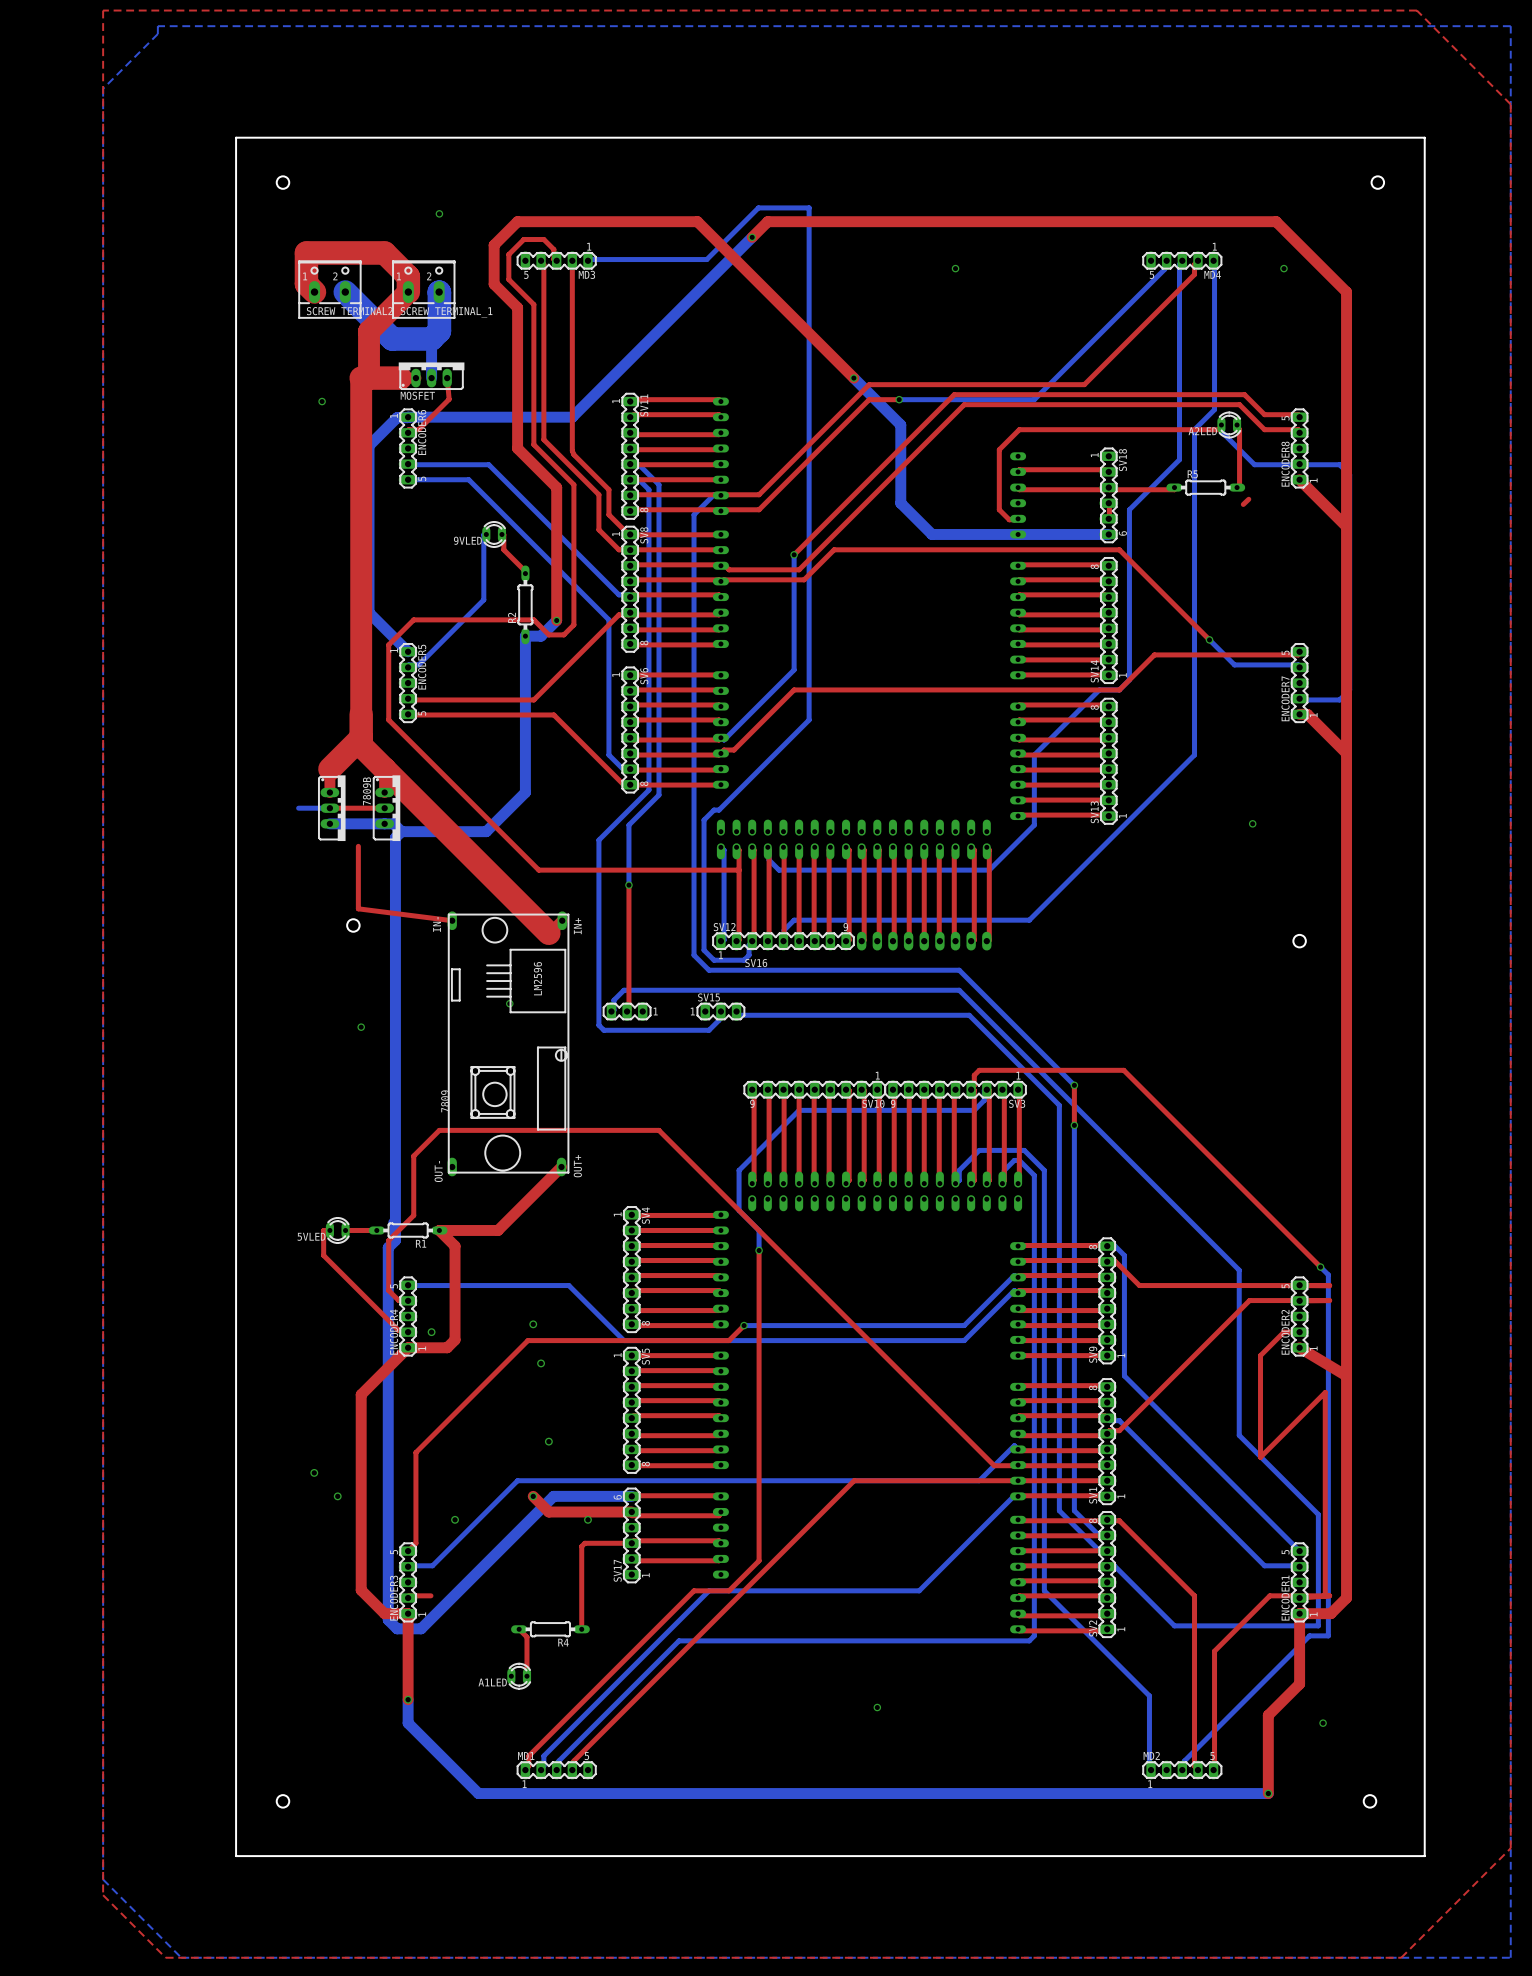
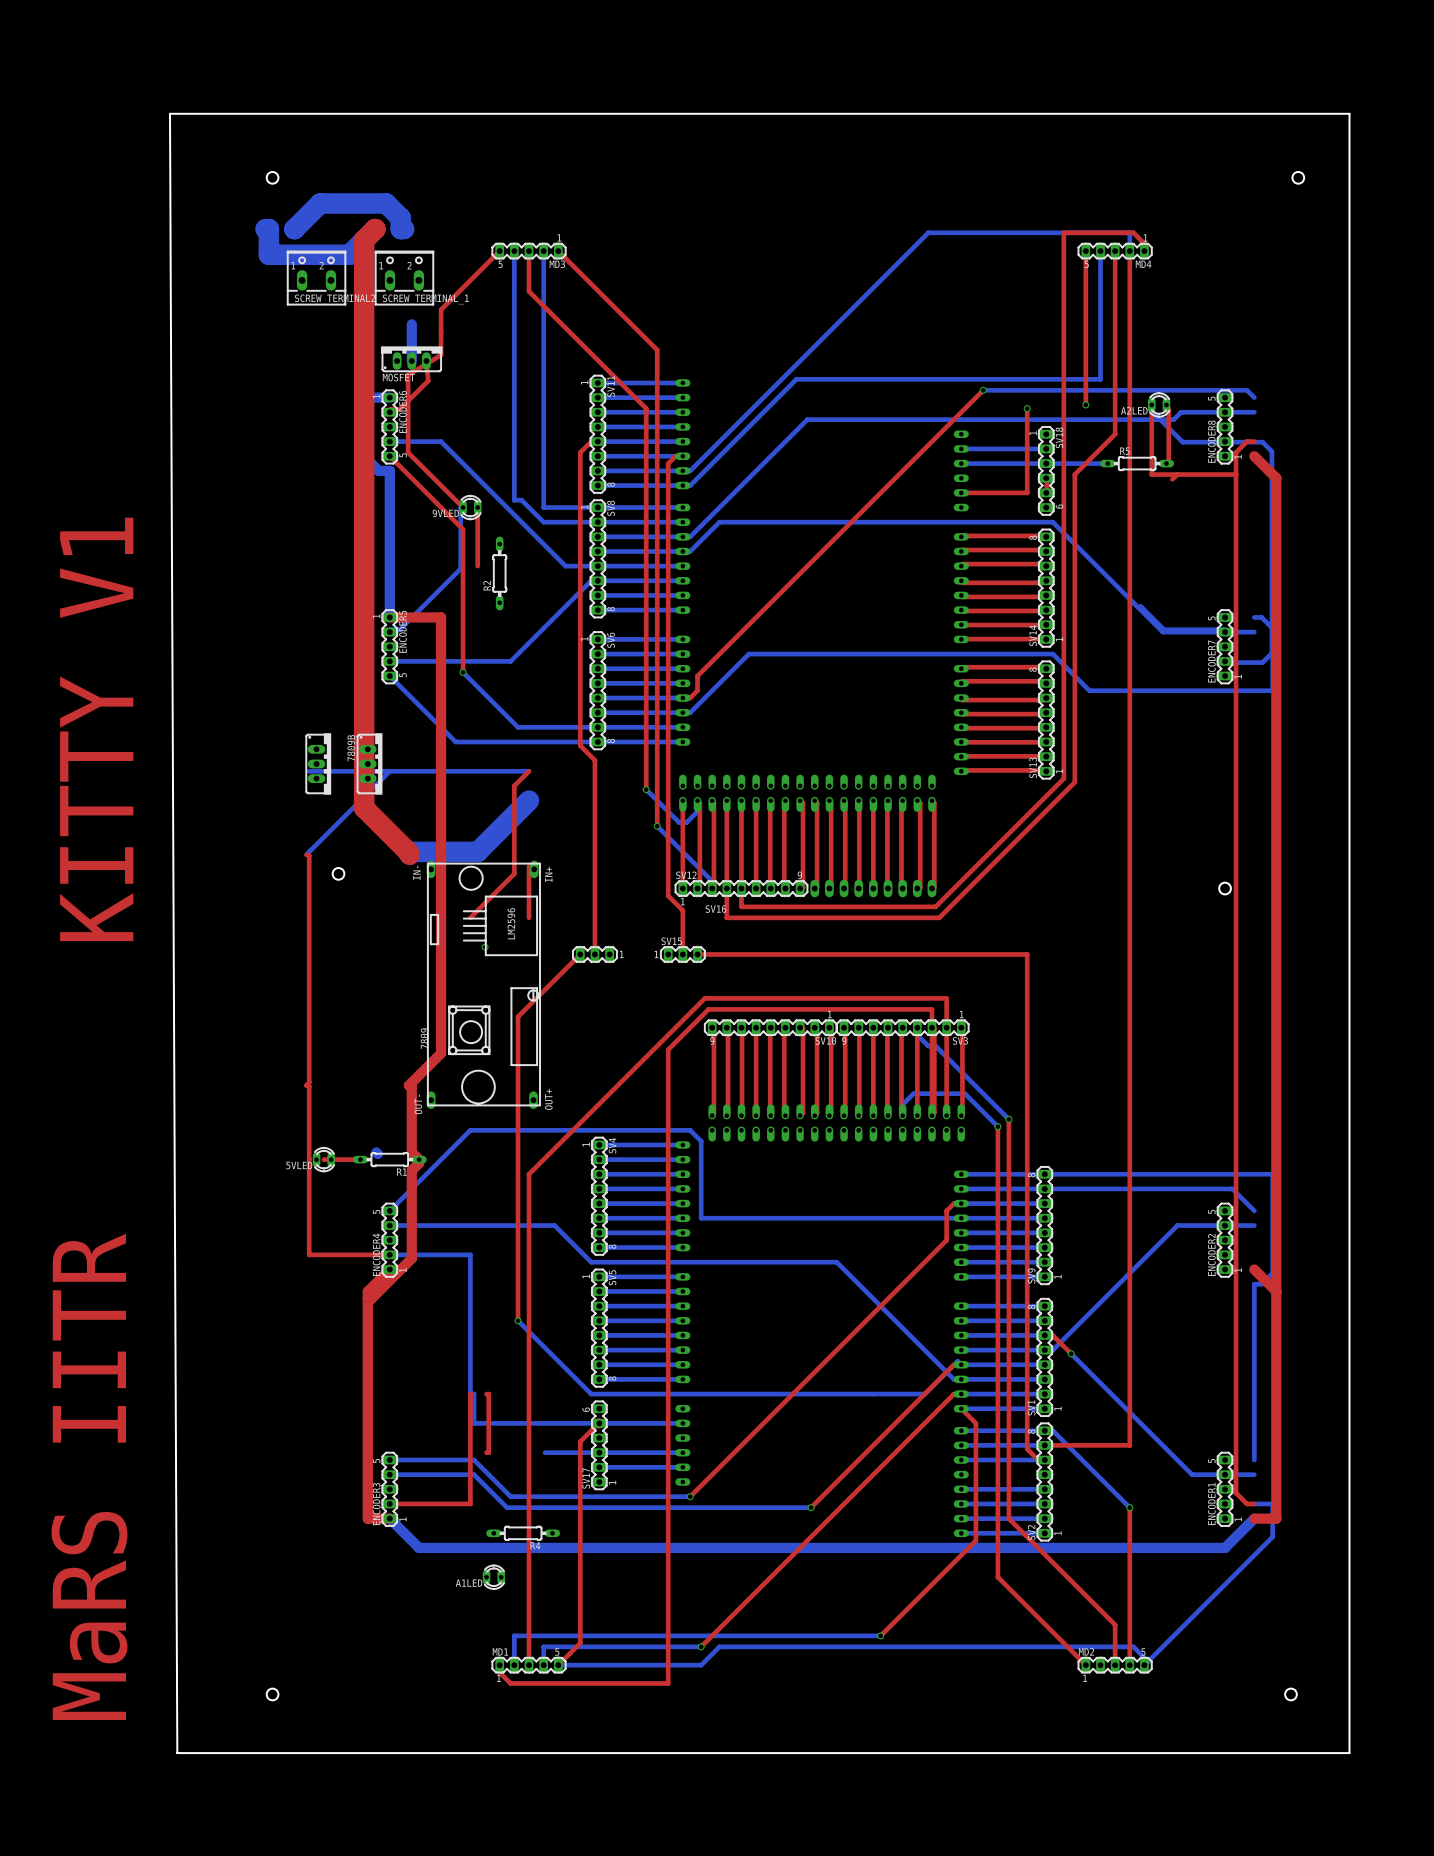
top zone outline: (103, 10) (103, 1895) (165, 1957) (1401, 1957) (1510, 1848) (1510, 104) (1416, 10) (103, 10) -> none
bottom zone outline: (157, 26) (1510, 26) (1510, 1957) (181, 1957) (103, 1879) (103, 88) (157, 34) (157, 26) -> none
board edge: (236, 137) (1424, 137) (1424, 1856) (236, 1856) (236, 137) -> (169, 113) (177, 1753) (1349, 1753) (1349, 113) (169, 113)
via: (439, 213) -> none
bottom track: none -> (265, 229) (268, 229) (268, 254) (349, 254) (375, 229)
bottom track: none -> (294, 229) (320, 203) (386, 203) (400, 218) (400, 229) (404, 229)
top track: none -> (375, 229) (364, 240) (364, 807) (409, 854)
bottom track: (752, 237) (572, 417) (397, 417) (369, 445) (369, 612) (408, 651) -> (389, 397) (367, 397) (367, 459) (378, 470) (389, 470) (389, 617)
top track: (752, 237) (767, 221) (1276, 221) (1346, 292) (1346, 1598) (1330, 1613) (1299, 1613) (1299, 1684) (1268, 1715) (1268, 1793) -> none
via: (752, 237) -> none
top track: none -> (499, 251) (441, 309) (441, 355) (408, 374) (408, 452) (463, 507)
bottom track: none -> (514, 251) (514, 500) (521, 500) (543, 522) (682, 522)
top track: (541, 260) (543, 264) (543, 439) (598, 494) (598, 529) (618, 549) (720, 550) -> none
top track: (556, 260) (553, 259) (553, 249) (543, 239) (523, 239) (508, 254) (508, 279) (533, 304) (533, 444) (573, 484) (573, 624) (563, 634) (548, 634) (533, 619) (413, 619) (388, 644) (388, 719) (538, 870) (739, 870) -> (529, 251) (529, 291) (646, 408) (646, 789)
bottom track: none -> (543, 251) (543, 507) (682, 507)
top track: (572, 260) (572, 450) (573, 454) (608, 489) (608, 514) (628, 534) (720, 534) -> none
bottom track: (587, 260) (706, 259) (758, 207) (809, 207) (809, 719) (719, 810) (714, 810) (704, 820) (704, 950) (714, 960) (744, 960) (749, 955) (749, 945) (752, 941) -> (657, 826) (712, 881) (712, 888)
top track: none -> (558, 251) (657, 350) (657, 826)
top track: none -> (1085, 251) (1085, 404)
bottom track: (1166, 260) (1164, 269) (1034, 399) (899, 399) -> (1100, 251) (1100, 379) (796, 379) (690, 485) (597, 485)
bottom track: (1182, 260) (1179, 264) (1179, 459) (1129, 509) (1129, 679) (1119, 689) (1099, 689) (1034, 755) (1034, 825) (989, 870) (779, 870) (769, 860) (767, 847) -> none
bottom track: none -> (1129, 251) (1129, 232) (928, 232) (690, 470) (597, 470)
top track: (1197, 260) (1194, 264) (1194, 274) (1084, 384) (869, 384) (759, 494) (630, 495) -> (1129, 251) (1129, 1445) (1044, 1445)
bottom track: (1213, 260) (1214, 409) (1194, 429) (1194, 755) (1029, 920) (794, 920) (784, 930) (783, 941) -> none
via: (955, 268) -> none
via: (1283, 268) -> none
top track: (314, 292) (306, 284) (306, 252) (384, 252) (408, 276) (408, 292) (369, 331) (369, 378) -> none
bottom track: (345, 292) (392, 338) (431, 338) (439, 331) (439, 292) -> none
top track: (415, 378) (361, 378) (361, 745) (548, 933) (562, 920) (559, 920) -> none
bottom track: (853, 378) (900, 425) (900, 503) (932, 534) (1108, 534) -> none
top track: (853, 378) (697, 221) (517, 221) (494, 245) (494, 284) (517, 307) (517, 448) (556, 487) (556, 620) -> none
via: (853, 378) -> none
top track: (899, 399) (869, 399) (759, 509) (630, 511) -> none
via: (899, 399) -> none
via: (322, 401) -> none
bottom track: none -> (597, 382) (682, 382)
top track: (630, 401) (633, 399) (719, 399) (720, 401) -> none
bottom track: none -> (983, 390) (1247, 390) (1254, 397)
via: none -> (983, 390)
bottom track: none -> (597, 397) (682, 397)
top track: (630, 417) (633, 414) (719, 414) (720, 417) -> none
top track: (1299, 417) (1298, 414) (1264, 414) (1244, 394) (954, 394) (794, 554) -> none
via: none -> (1085, 404)
top track: (1221, 425) (1219, 429) (1019, 429) (999, 449) (999, 509) (1009, 519) (1018, 518) -> (1027, 408) (1027, 492) (961, 492)
top track: none -> (1151, 404) (1151, 474) (1236, 474)
via: none -> (1027, 408)
bottom track: none -> (597, 412) (682, 412)
top track: (630, 432) (633, 434) (719, 434) (720, 432) -> none
top track: (1299, 432) (1298, 429) (1264, 429) (1239, 404) (964, 404) (799, 569) (729, 569) (724, 564) (630, 565) -> none
bottom track: none -> (1254, 412) (1181, 412) (1173, 419) (807, 419) (690, 536) (597, 536)
bottom track: none -> (597, 426) (682, 426)
top track: (630, 448) (720, 448) -> none
bottom track: (408, 464) (488, 464) (618, 594) (628, 594) (630, 597) -> (389, 441) (441, 441) (565, 566) (682, 566)
bottom track: (630, 464) (638, 464) (658, 484) (658, 795) (628, 825) (628, 885) -> (597, 441) (682, 441)
top track: (630, 464) (720, 464) -> none
top track: none -> (1254, 441) (1247, 441) (1236, 452) (1236, 1492) (1247, 1503) (1254, 1503)
bottom track: none -> (961, 448) (1046, 448)
top track: (1018, 471) (1019, 469) (1104, 469) (1108, 471) -> none
bottom track: (408, 479) (468, 479) (608, 619) (608, 755) (623, 770) (630, 769) -> none
top track: none -> (389, 456) (463, 529) (463, 672)
top track: (630, 479) (713, 479) -> (682, 954) (682, 910) (668, 895) (668, 463) (675, 456)
bottom track: (638, 479) (648, 489) (648, 790) (598, 840) (598, 1025) (603, 1030) (709, 1030) (719, 1020) (720, 1011) -> (606, 456) (682, 456)
top track: (1299, 479) (1346, 526) -> none
top track: none -> (1254, 456) (1276, 478) (1276, 1518) (1254, 1518)
bottom track: none -> (961, 463) (1107, 463)
top track: (1018, 487) (1019, 489) (1104, 489) (1108, 487) (1109, 489) (1174, 489) (1174, 487) -> none
bottom track: (720, 495) (714, 494) (694, 514) (694, 955) (709, 970) (959, 970) (1074, 1085) -> none
top track: (501, 534) (503, 534) (503, 549) (525, 573) -> (477, 507) (477, 566)
bottom track: (794, 554) (794, 669) (724, 740) (720, 737) -> (597, 698) (682, 698)
via: (794, 554) -> none
bottom track: none -> (597, 551) (690, 551) (719, 522) (1052, 522) (1162, 632) (1254, 632)
top track: (630, 581) (633, 579) (719, 579) (720, 581) (724, 579) (804, 579) (834, 549) (1119, 549) (1209, 639) -> none
top track: (630, 597) (633, 594) (719, 594) (720, 597) -> none
bottom track: none -> (682, 580) (591, 580) (510, 661) (389, 661)
top track: (720, 612) (719, 614) (633, 614) (630, 612) (628, 614) (618, 614) (533, 699) (408, 698) -> none
bottom track: (556, 620) (541, 636) (525, 636) (525, 792) (486, 831) (401, 831) -> none
via: (556, 620) -> none
bottom track: none -> (597, 595) (682, 595)
top track: (630, 628) (633, 629) (719, 629) (720, 628) -> none
via: (1209, 639) -> none
bottom track: none -> (597, 610) (682, 610)
top track: (630, 643) (720, 643) -> none
top track: none -> (389, 617) (441, 617) (441, 1053) (408, 1085) (411, 1086) (411, 1152) (419, 1159) (419, 1163) (411, 1170) (411, 1258) (371, 1298) (367, 1298)
top track: (1299, 651) (1298, 654) (1154, 654) (1119, 689) (794, 689) (734, 750) (724, 750) (719, 755) (630, 753) -> none
bottom track: none -> (1254, 617) (1261, 617) (1272, 628) (1272, 690) (1089, 690) (1052, 654) (748, 654) (690, 712) (597, 712)
bottom track: none -> (597, 639) (682, 639)
top track: (630, 675) (720, 675) -> none
bottom track: none -> (597, 654) (682, 654)
top track: (630, 690) (720, 690) -> none
bottom track: none -> (597, 668) (682, 668)
top track: (630, 706) (633, 704) (719, 704) (720, 706) -> none
bottom track: none -> (463, 672) (518, 727) (682, 727)
via: none -> (463, 672)
bottom track: none -> (389, 676) (455, 741) (682, 741)
top track: (408, 714) (553, 714) (623, 785) (720, 784) -> none
top track: (1299, 714) (1307, 714) (1346, 753) -> none
bottom track: none -> (597, 683) (682, 683)
top track: (630, 722) (633, 719) (719, 719) (720, 722) -> none
top track: (361, 737) (329, 769) (329, 792) -> none
top track: (630, 737) (633, 740) (719, 740) (720, 737) -> (983, 390) (697, 676) (697, 690) (690, 698) (682, 698)
top track: (630, 769) (720, 769) -> none
text: none -> KITTY V1 (96, 729)
bottom track: (298, 808) (329, 808) -> none
top track: (329, 808) (387, 808) -> none
bottom track: none -> (309, 771) (529, 771)
bottom track: none -> (389, 771) (306, 854)
top track: none -> (529, 771) (514, 785) (514, 873) (470, 917)
bottom track: (329, 823) (393, 823) (401, 831) -> none
via: (1252, 823) -> none
bottom track: (401, 831) (395, 837) (395, 1240) (388, 1247) (388, 1619) (397, 1628) (421, 1628) (553, 1496) (631, 1496) -> none
bottom track: none -> (646, 789) (679, 822) (686, 822) (697, 811) (697, 800)
via: none -> (646, 789)
top track: (358, 846) (358, 908) (452, 920) -> none
bottom track: none -> (529, 800) (477, 851) (411, 851) (409, 854)
bottom track: (720, 847) (724, 850) (724, 940) (720, 941) -> none
top track: none -> (682, 800) (682, 888)
top track: (767, 847) (767, 941) -> (726, 800) (726, 917) (939, 917) (1074, 782) (1074, 474) (1115, 434) (1115, 251)
top track: (783, 847) (783, 941) -> (741, 800) (741, 906) (935, 906) (1063, 778) (1063, 232) (1133, 232) (1144, 243) (1144, 251)
via: none -> (657, 826)
top track: (628, 885) (628, 1010) (627, 1011) -> (597, 441) (591, 441) (580, 452) (580, 745) (594, 760) (594, 954)
via: (628, 885) -> none
top track: none -> (529, 866) (529, 917)
bottom track: (611, 1011) (613, 1010) (613, 1000) (623, 990) (959, 990) (1239, 1270) (1239, 1435) (1318, 1514) (1318, 1625) (1174, 1625) (1114, 1565) (1107, 1566) -> none
top track: none -> (580, 954) (518, 1016) (518, 1320)
bottom track: (736, 1011) (739, 1015) (969, 1015) (1059, 1105) (1059, 1510) (1099, 1550) (1107, 1551) -> (961, 1460) (1044, 1460)
via: (361, 1027) -> none
top track: (1074, 1085) (1074, 1125) -> none
via: (1074, 1085) -> none
bottom track: none -> (917, 1027) (917, 1035) (928, 1046) (935, 1046) (1008, 1119)
bottom track: (986, 1089) (984, 1090) (984, 1100) (974, 1110) (799, 1110) (739, 1170) (739, 1210) (759, 1230) (759, 1250) -> none
top track: (1002, 1089) (1004, 1090) (1004, 1180) (1002, 1183) -> (529, 1665) (529, 1174) (704, 998) (946, 998) (946, 1115)
bottom track: (1074, 1125) (1074, 1510) (1099, 1535) (1107, 1535) -> (961, 1445) (1044, 1445)
via: (1074, 1125) -> none
top track: (561, 1167) (498, 1230) (439, 1230) (455, 1246) (455, 1339) (447, 1347) (408, 1347) -> none
bottom track: (955, 1183) (959, 1180) (959, 1170) (979, 1150) (1024, 1150) (1044, 1170) (1044, 1590) (1149, 1695) (1151, 1770) -> (902, 1115) (902, 1104) (913, 1093) (964, 1093) (997, 1126)
top track: (971, 1183) (974, 1180) (974, 1090) (971, 1089) (974, 1085) (974, 1075) (979, 1070) (1123, 1070) (1320, 1267) -> (917, 1115) (917, 1027)
bottom track: (1002, 1183) (1004, 1170) (1014, 1160) (1019, 1160) (1034, 1175) (1034, 1635) (1029, 1640) (679, 1640) (558, 1761) (556, 1770) -> none
top track: none -> (1008, 1119) (1008, 1518) (1115, 1624) (1115, 1665)
via: none -> (1008, 1119)
top track: none -> (997, 1126) (997, 1577) (1085, 1665)
via: none -> (997, 1126)
bottom track: none -> (599, 1144) (682, 1144)
top track: (631, 1214) (720, 1214) -> none
top track: (329, 1230) (323, 1230) (323, 1255) (398, 1330) (408, 1332) -> (306, 854) (309, 855) (309, 1082) (306, 1085) (309, 1086) (309, 1254) (389, 1254)
top track: none -> (323, 1159) (331, 1159)
bottom track: none -> (599, 1159) (682, 1159)
top track: (631, 1230) (720, 1230) -> none
bottom track: none -> (599, 1174) (682, 1174)
top track: (631, 1246) (720, 1246) -> none
bottom track: none -> (961, 1174) (1272, 1174) (1272, 1273) (1261, 1284) (1254, 1284) (1254, 1460)
top track: (1018, 1246) (1107, 1246) -> none
bottom track: (1107, 1246) (1114, 1245) (1124, 1255) (1124, 1375) (1299, 1551) -> none
top track: (759, 1250) (759, 1560) (729, 1590) (694, 1590) (528, 1755) (528, 1766) (525, 1770) -> (931, 1115) (931, 1009) (708, 1009) (668, 1049) (668, 1683) (510, 1683) (499, 1672) (499, 1665)
via: (759, 1250) -> none
bottom track: none -> (599, 1188) (682, 1188)
top track: (631, 1261) (720, 1261) -> none
bottom track: none -> (961, 1188) (1232, 1188) (1254, 1210)
top track: (1018, 1261) (1114, 1260) (1139, 1285) (1329, 1285) (1299, 1285) -> none
bottom track: (1320, 1267) (1328, 1274) (1328, 1635) (1309, 1635) (1184, 1761) (1182, 1770) -> none
via: (1320, 1267) -> none
bottom track: none -> (599, 1203) (682, 1203)
top track: (631, 1277) (633, 1275) (719, 1275) (720, 1277) -> none
bottom track: (1018, 1277) (1014, 1275) (964, 1325) (744, 1325) -> (961, 1203) (1044, 1203)
top track: (1018, 1277) (1019, 1275) (1104, 1275) (1107, 1277) -> (961, 1203) (953, 1203) (946, 1210) (946, 1240) (690, 1496)
bottom track: (408, 1285) (568, 1285) (623, 1340) (964, 1340) (1014, 1290) (1018, 1293) -> (389, 1210) (470, 1130) (690, 1130) (701, 1141) (701, 1218) (1044, 1218)
bottom track: none -> (599, 1218) (682, 1218)
top track: (631, 1293) (633, 1290) (719, 1290) (720, 1293) -> none
top track: (1018, 1293) (1019, 1290) (1104, 1290) (1107, 1293) -> none
bottom track: none -> (389, 1225) (554, 1225) (591, 1262) (836, 1262) (953, 1379) (1044, 1379)
top track: (408, 1300) (398, 1300) (388, 1290) (388, 1240) (413, 1215) (413, 1156) (439, 1130) (658, 1130) (994, 1465) (1107, 1465) -> none
top track: (1299, 1300) (1329, 1300) (1249, 1300) (1119, 1430) (1109, 1430) (1104, 1435) (1019, 1435) (1018, 1433) -> none
bottom track: none -> (1254, 1225) (1177, 1225) (1052, 1350) (961, 1350)
bottom track: none -> (599, 1232) (682, 1232)
top track: (631, 1308) (633, 1310) (719, 1310) (720, 1308) -> none
bottom track: none -> (961, 1232) (1044, 1232)
top track: (1018, 1308) (1019, 1310) (1104, 1310) (1107, 1308) -> none
via: (533, 1324) -> none
bottom track: none -> (599, 1247) (682, 1247)
top track: (631, 1324) (720, 1324) -> none
bottom track: none -> (961, 1247) (1044, 1247)
top track: (1018, 1324) (1107, 1324) -> none
top track: (744, 1325) (729, 1340) (527, 1340) (415, 1452) (415, 1543) (408, 1551) -> none
via: (744, 1325) -> none
bottom track: none -> (389, 1254) (470, 1254) (470, 1394) (474, 1394) (474, 1423) (682, 1423)
via: (431, 1332) -> none
top track: (1299, 1332) (1283, 1332) (1260, 1355) (1260, 1457) (1325, 1392) (1325, 1595) -> none
bottom track: none -> (961, 1262) (1044, 1262)
top track: (1018, 1339) (1107, 1339) -> none
top track: (1299, 1347) (1346, 1375) -> none
top track: none -> (1254, 1269) (1276, 1291)
bottom track: none -> (599, 1276) (682, 1276)
top track: (631, 1355) (720, 1355) -> none
bottom track: none -> (961, 1276) (1044, 1276)
top track: (1018, 1355) (1107, 1355) -> none
via: (541, 1363) -> none
top track: (384, 1371) (361, 1394) (361, 1590) (384, 1613) -> (367, 1291) (367, 1518)
bottom track: none -> (599, 1291) (682, 1291)
top track: (631, 1371) (720, 1371) -> none
bottom track: none -> (599, 1306) (682, 1306)
top track: (631, 1386) (720, 1386) -> none
bottom track: none -> (961, 1306) (1044, 1306)
top track: (1018, 1386) (1107, 1386) -> none
via: none -> (518, 1320)
bottom track: none -> (599, 1320) (682, 1320)
top track: (631, 1402) (633, 1400) (719, 1400) (720, 1402) -> none
bottom track: none -> (961, 1320) (1044, 1320)
top track: (1018, 1402) (1019, 1400) (1104, 1400) (1107, 1402) -> none
bottom track: none -> (599, 1335) (682, 1335)
top track: (631, 1418) (633, 1415) (719, 1415) (720, 1418) -> none
top track: (1018, 1418) (1019, 1415) (1104, 1415) (1107, 1418) -> (1071, 1353) (1052, 1335) (1044, 1335)
bottom track: (1107, 1418) (1109, 1420) (1119, 1420) (1264, 1565) (1299, 1566) -> (1044, 1335) (961, 1335)
bottom track: none -> (599, 1350) (682, 1350)
top track: (631, 1433) (633, 1435) (719, 1435) (720, 1433) -> none
bottom track: none -> (1071, 1353) (1192, 1474) (1254, 1474)
via: none -> (1071, 1353)
via: (548, 1441) -> none
bottom track: none -> (599, 1364) (682, 1364)
top track: (631, 1449) (720, 1449) -> none
bottom track: none -> (961, 1364) (1044, 1364)
top track: (1018, 1449) (1107, 1449) -> (961, 1364) (953, 1364) (811, 1507)
bottom track: none -> (599, 1379) (682, 1379)
top track: (631, 1465) (720, 1465) -> none
via: (314, 1472) -> none
top track: none -> (486, 1394) (488, 1394) (488, 1452) (486, 1452)
bottom track: (623, 1480) (517, 1480) (432, 1565) (408, 1566) -> (591, 1394) (518, 1320)
top track: (1010, 1480) (854, 1480) (573, 1761) (572, 1770) -> (953, 1394) (701, 1646)
bottom track: none -> (961, 1394) (1044, 1394)
top track: (1018, 1480) (1107, 1480) -> none
via: (337, 1496) -> none
top track: (533, 1496) (548, 1512) (630, 1512) -> (558, 1665) (580, 1643) (580, 1441) (598, 1423)
via: (533, 1496) -> none
top track: (631, 1496) (720, 1496) -> none
bottom track: (1018, 1496) (1014, 1495) (919, 1590) (709, 1590) (543, 1755) (543, 1766) (541, 1770) -> (880, 1635) (514, 1635) (514, 1665)
bottom track: none -> (961, 1408) (1044, 1408)
top track: (1018, 1496) (1107, 1496) -> (961, 1408) (975, 1423) (975, 1540) (880, 1635)
top track: (720, 1512) (719, 1515) (631, 1515) -> none
via: (455, 1519) -> none
via: (587, 1519) -> none
bottom track: none -> (961, 1430) (1052, 1430) (1129, 1507)
top track: (1018, 1519) (1119, 1520) (1194, 1595) (1194, 1766) (1197, 1770) -> (1129, 1507) (1129, 1665)
top track: (1018, 1535) (1107, 1535) -> none
bottom track: none -> (545, 1452) (682, 1452)
top track: (720, 1543) (719, 1540) (633, 1540) (631, 1543) (584, 1543) (581, 1546) (581, 1629) -> none
bottom track: none -> (389, 1460) (474, 1460) (510, 1496) (690, 1496)
top track: (1018, 1551) (1107, 1551) -> (697, 954) (1027, 954) (1027, 1449) (1038, 1460) (1044, 1460)
bottom track: none -> (599, 1467) (682, 1467)
top track: (631, 1558) (633, 1560) (719, 1560) (720, 1558) -> none
bottom track: none -> (389, 1474) (474, 1474) (507, 1507) (811, 1507)
top track: (1018, 1566) (1107, 1566) -> none
text: none -> MaRS IITR (89, 1476)
bottom track: none -> (961, 1489) (1044, 1489)
top track: (1018, 1582) (1019, 1580) (1104, 1580) (1107, 1582) -> none
via: none -> (690, 1496)
top track: (430, 1595) (408, 1595) (408, 1598) -> (471, 1394) (470, 1503) (389, 1503)
bottom track: none -> (961, 1503) (1044, 1503)
top track: (1018, 1598) (1019, 1595) (1104, 1595) (1107, 1598) -> none
top track: (1299, 1598) (1329, 1595) (1269, 1595) (1214, 1651) (1213, 1770) -> none
bottom track: none -> (1254, 1503) (1272, 1503) (1272, 1536) (1144, 1665)
via: none -> (811, 1507)
via: none -> (1129, 1507)
bottom track: none -> (389, 1518) (419, 1547) (1225, 1547) (1254, 1518)
top track: (408, 1613) (408, 1699) -> none
bottom track: none -> (961, 1518) (1044, 1518)
top track: (1018, 1613) (1019, 1615) (1104, 1615) (1107, 1613) -> none
top track: (519, 1629) (526, 1637) (526, 1676) -> none
bottom track: none -> (961, 1533) (1044, 1533)
top track: (1018, 1629) (1019, 1630) (1104, 1630) (1107, 1629) -> none
bottom track: (408, 1699) (408, 1723) (478, 1793) (1268, 1793) -> none
via: (408, 1699) -> none
via: (877, 1707) -> none
via: (1323, 1723) -> none
via: none -> (880, 1635)
bottom track: none -> (701, 1646) (543, 1646) (543, 1665)
via: none -> (701, 1646)
bottom track: none -> (1148, 1661) (1133, 1646) (719, 1646) (701, 1665) (558, 1665)
via: (1268, 1793) -> none

